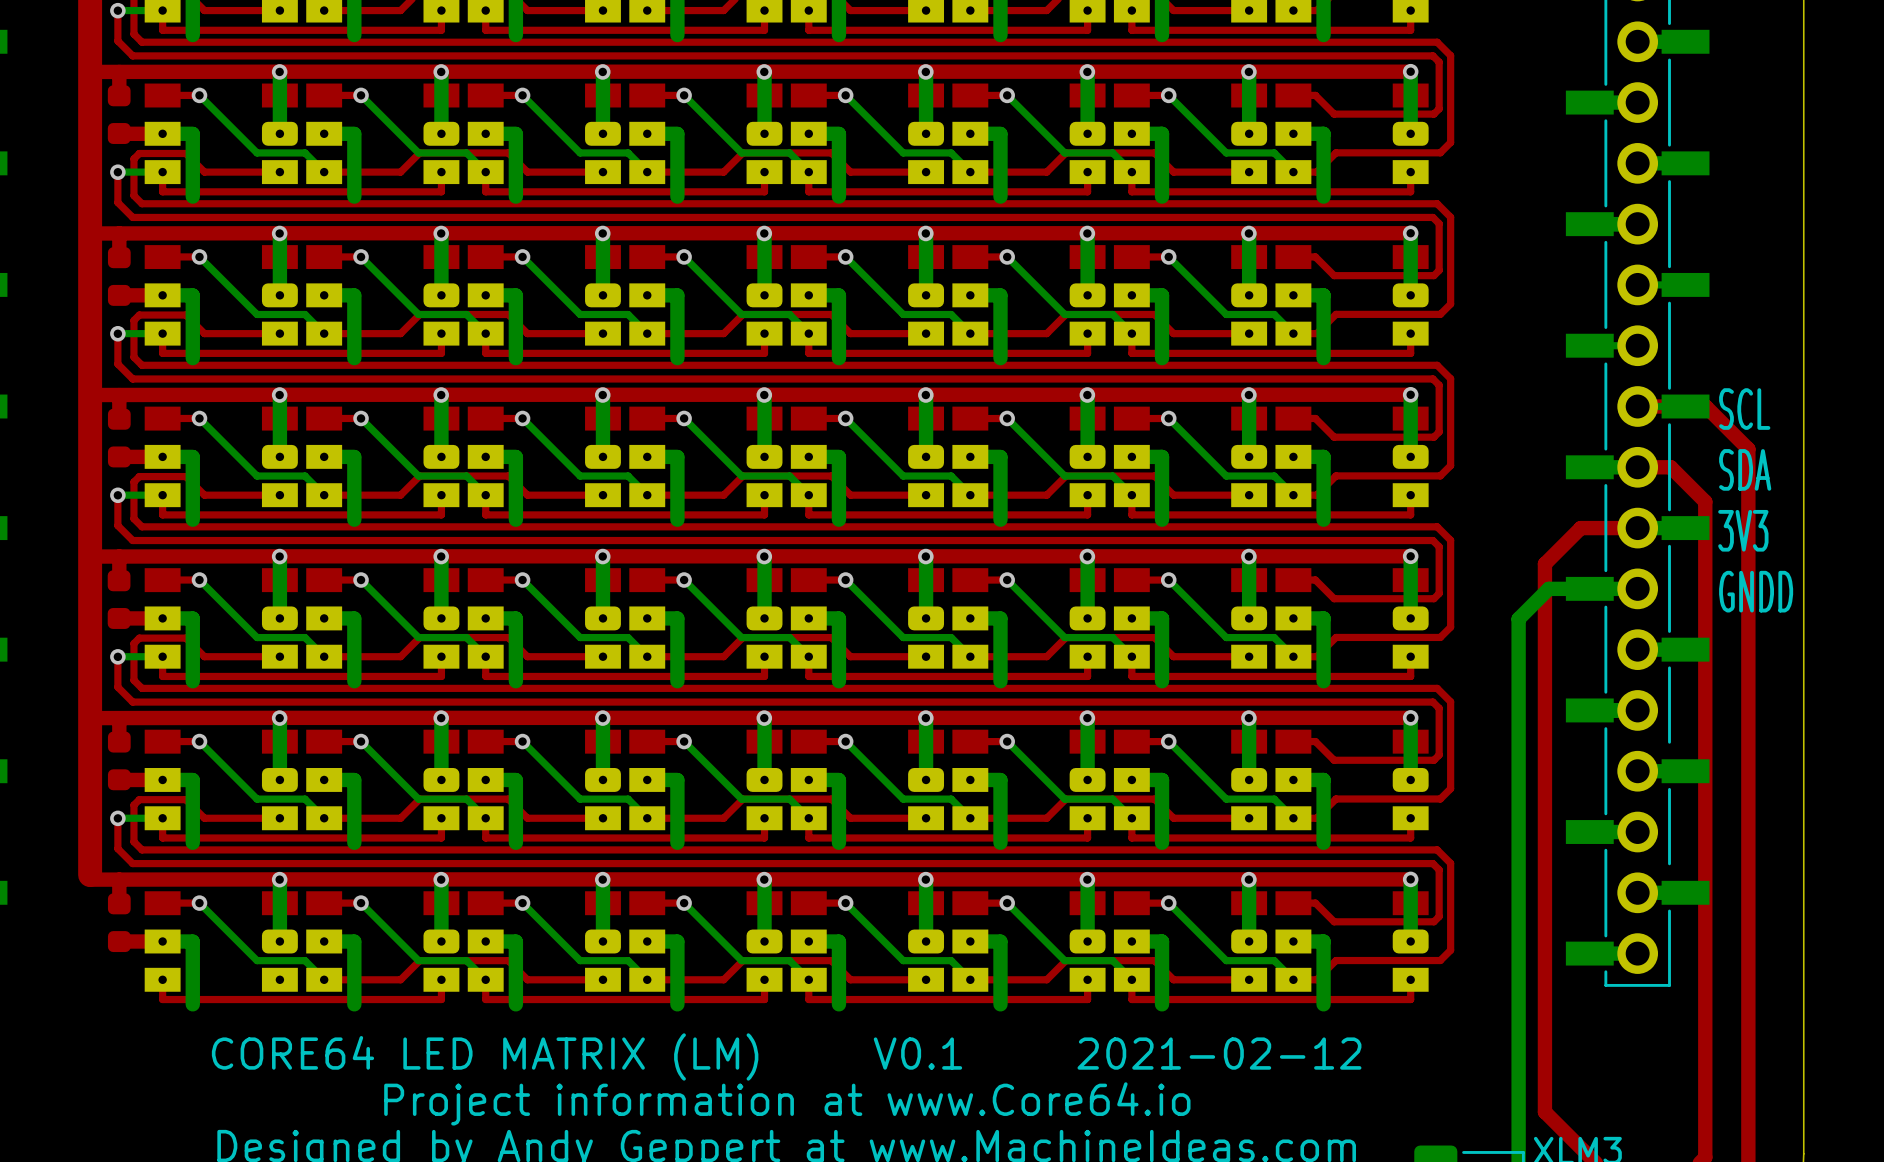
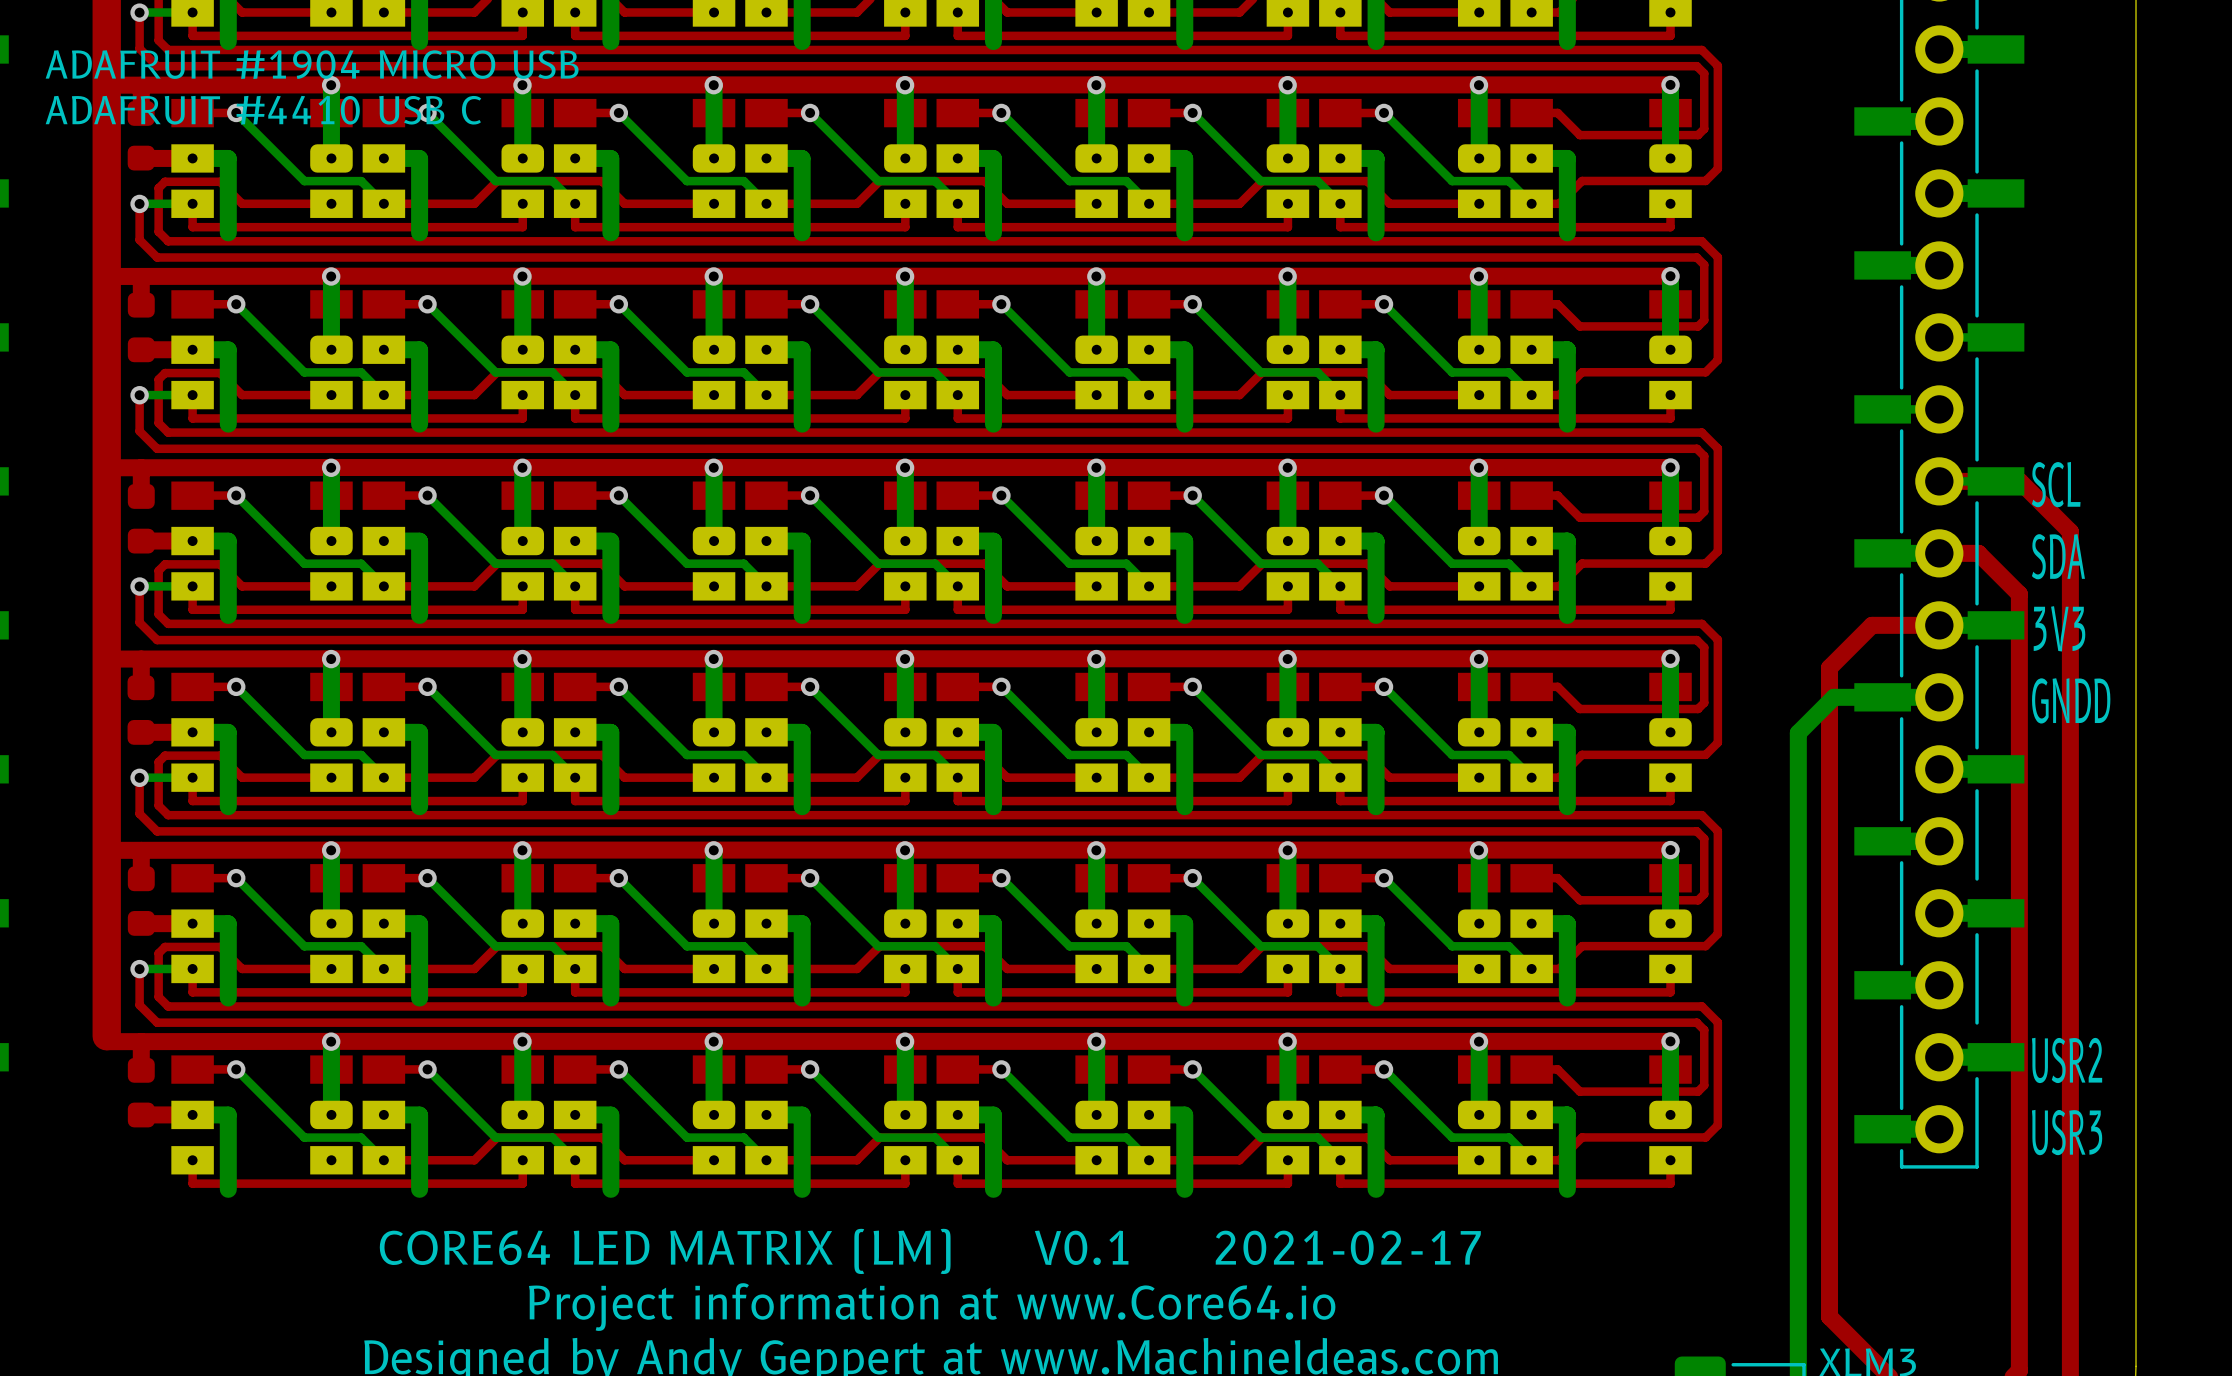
text: none -> ADAFRUIT #1904 MICRO USB (312, 64)
text: none -> ADAFRUIT #4410 USB C (263, 110)
text: none -> USR2 (2067, 1060)
text: none -> USR3 (2067, 1132)
text: CORE64 LED MATRIX (LM) V0.1 2021-02-12 (786, 1056) -> CORE64 LED MATRIX (LM) V0.1 2021-02-17 (930, 1251)

